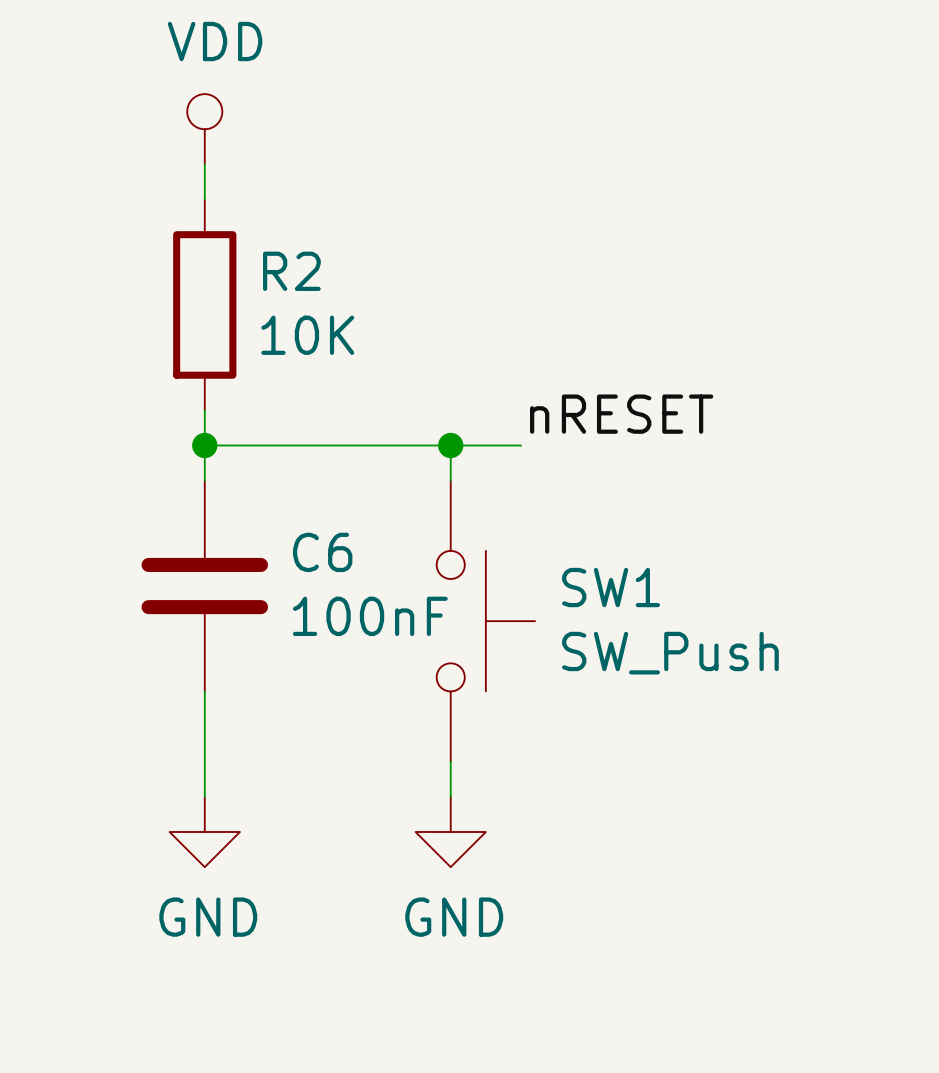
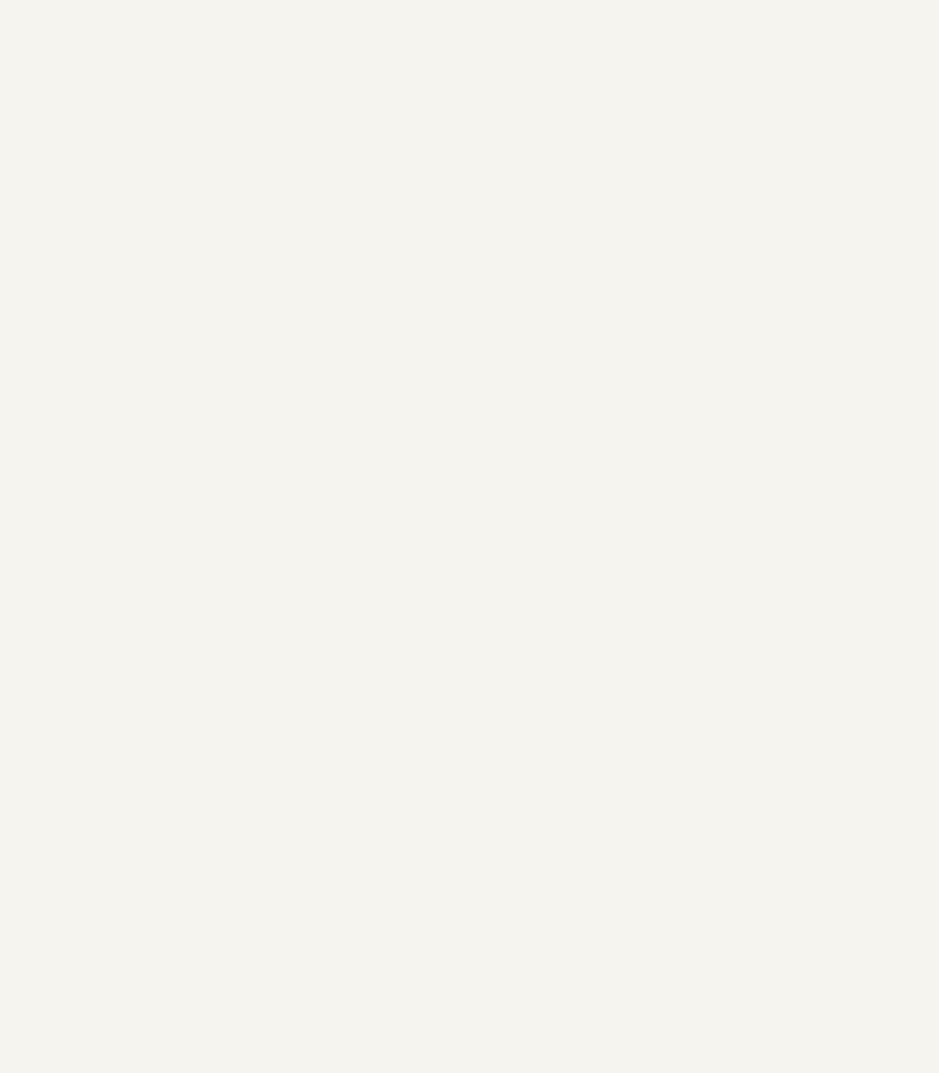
power symbol: VDD (204, 129) -> none
wire: (204, 164) (204, 199) -> none
R2: 10K (204, 304) -> none
wire: (204, 410) (204, 480) -> none
label: nRESET (621, 414) -> none
wire: (204, 445) (521, 445) -> none
junction: (204, 445) -> none
wire: (450, 445) (450, 480) -> none
junction: (450, 445) -> none
C6: 100nF (204, 586) -> none
SW1: SW_Push (485, 621) -> none
wire: (204, 691) (204, 796) -> none
wire: (450, 761) (450, 796) -> none
power symbol: GND (204, 831) -> none
power symbol: GND (450, 831) -> none

